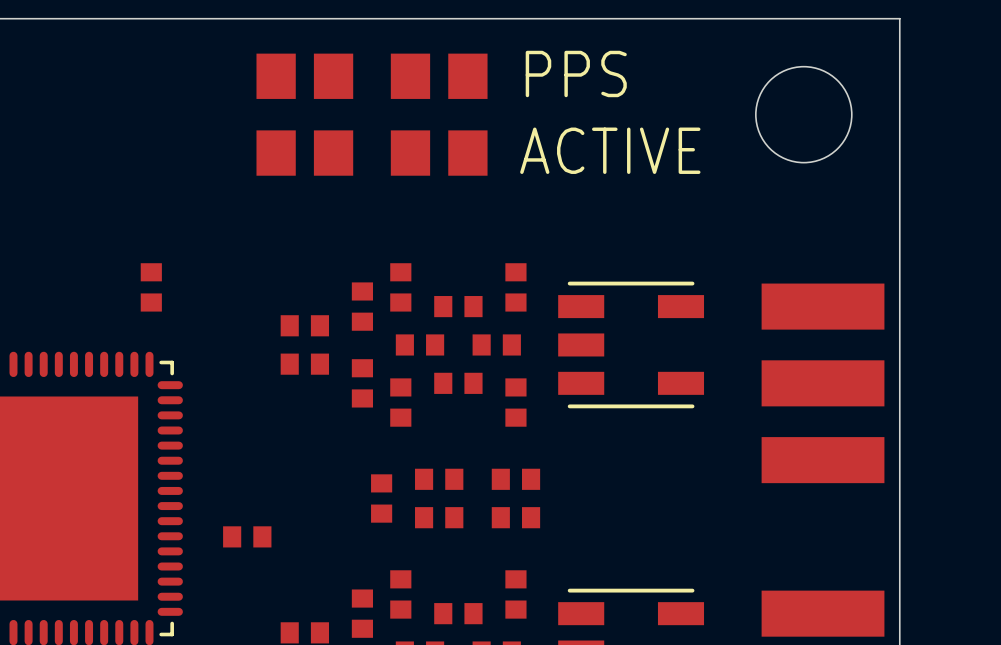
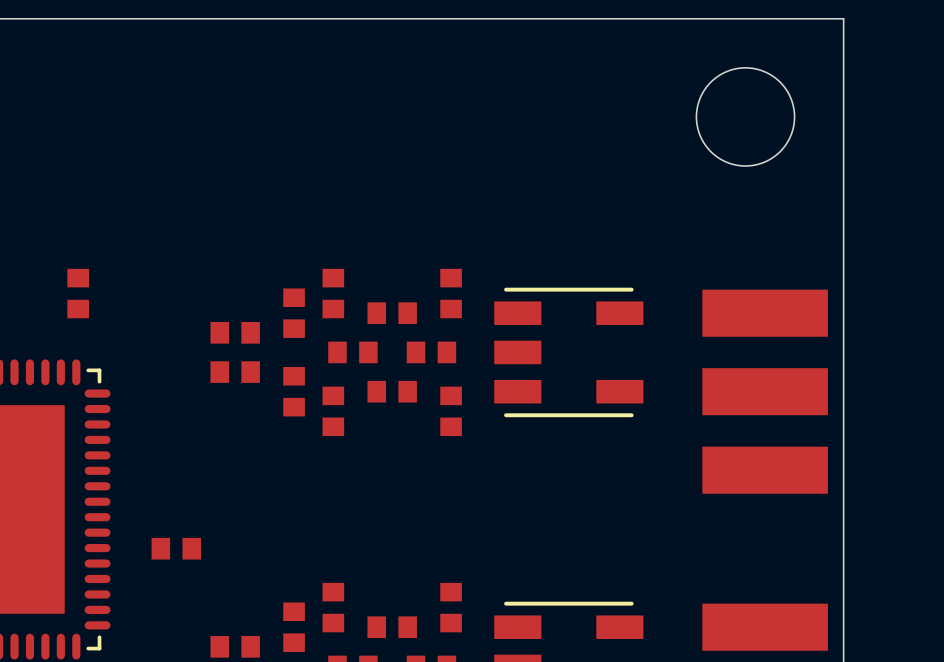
text: PPS (576, 73) -> none
part: (304, 76) -> none
part: (439, 76) -> none
text: ACTIVE (610, 150) -> none
part: (304, 153) -> none
part: (439, 153) -> none
part: (439, 479) -> none
part: (515, 479) -> none
part: (381, 498) -> none
part: (439, 517) -> none
part: (515, 517) -> none

